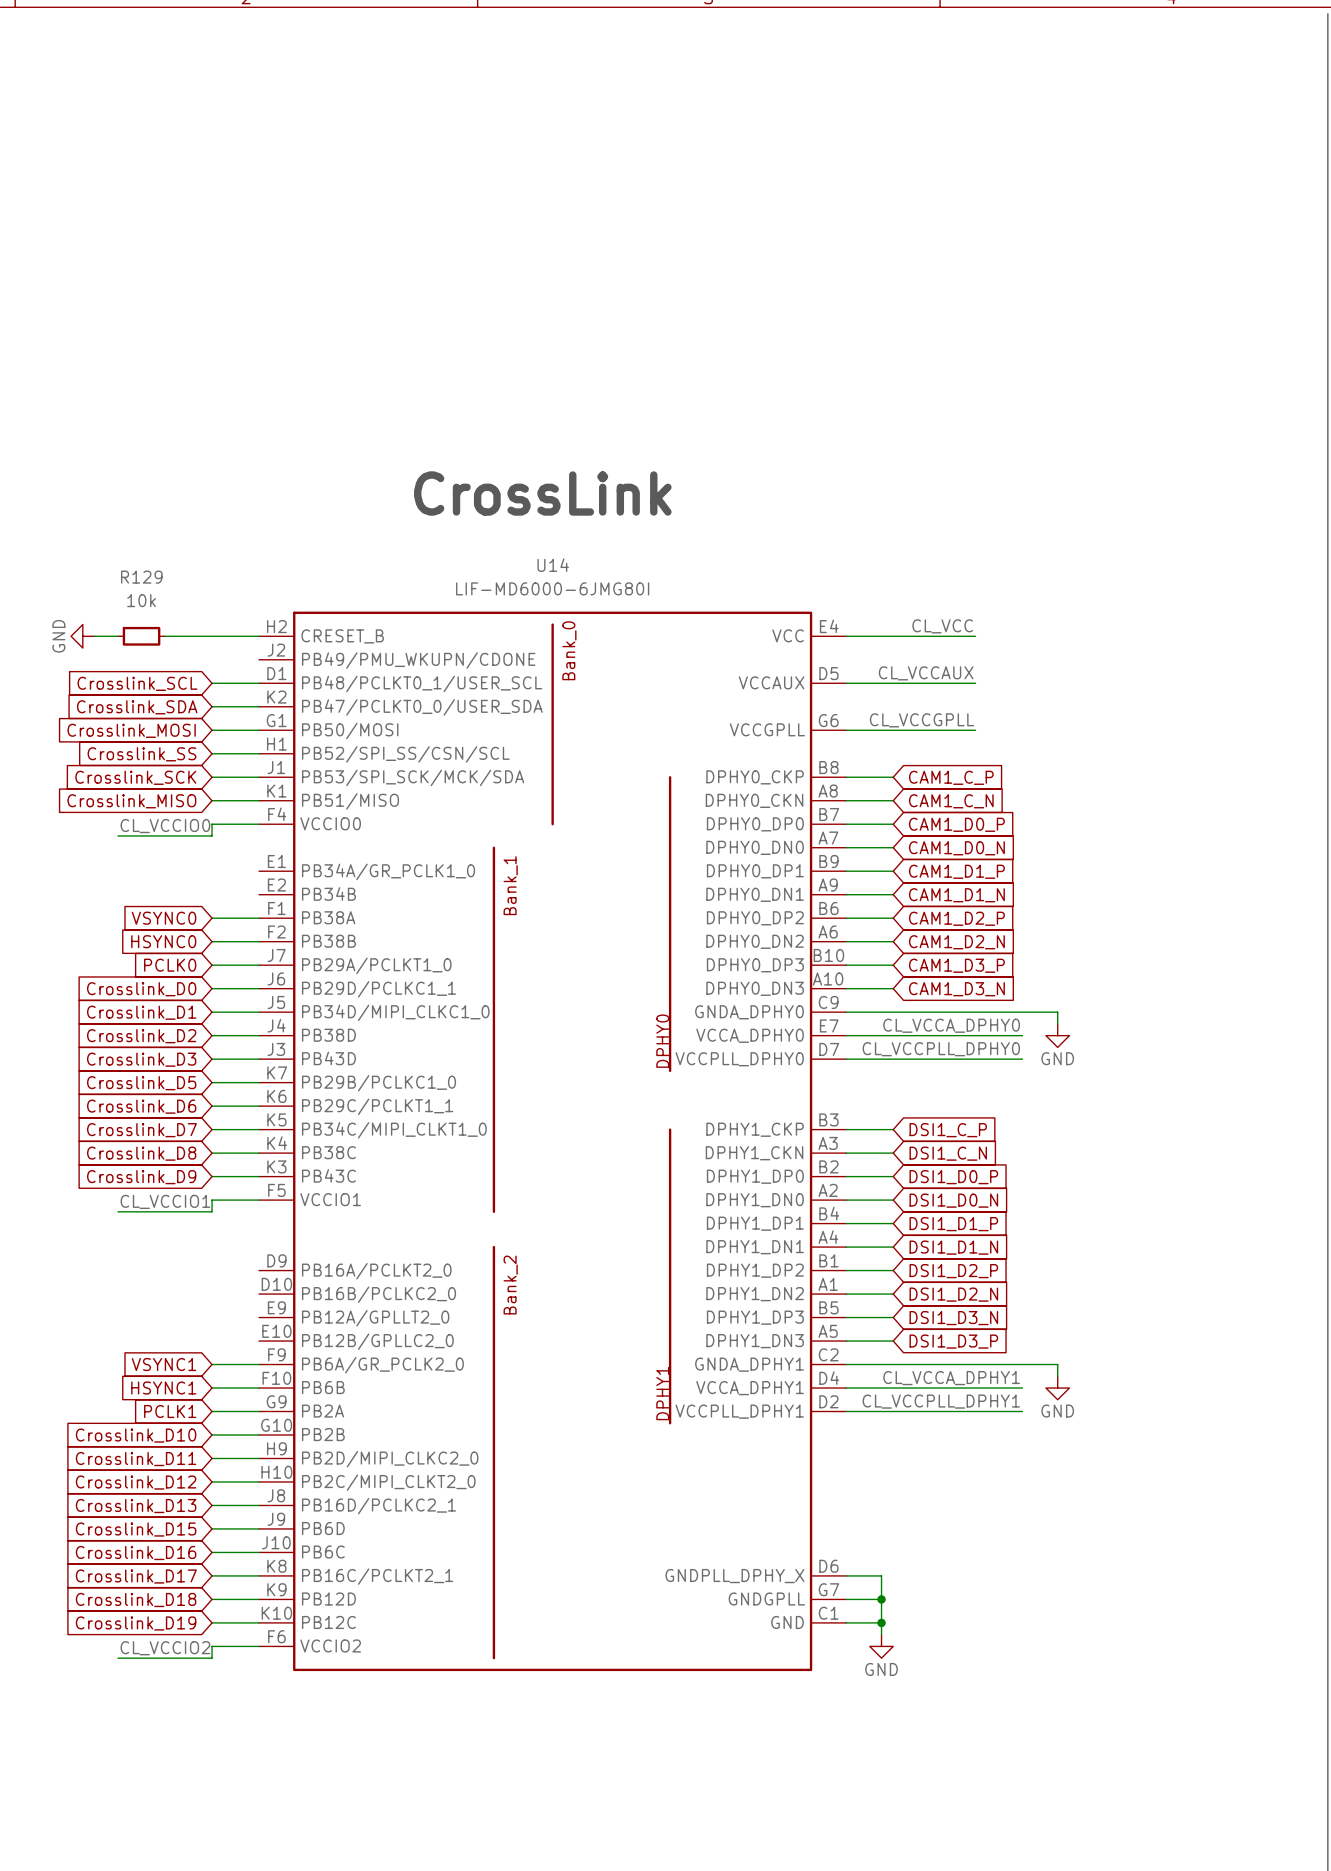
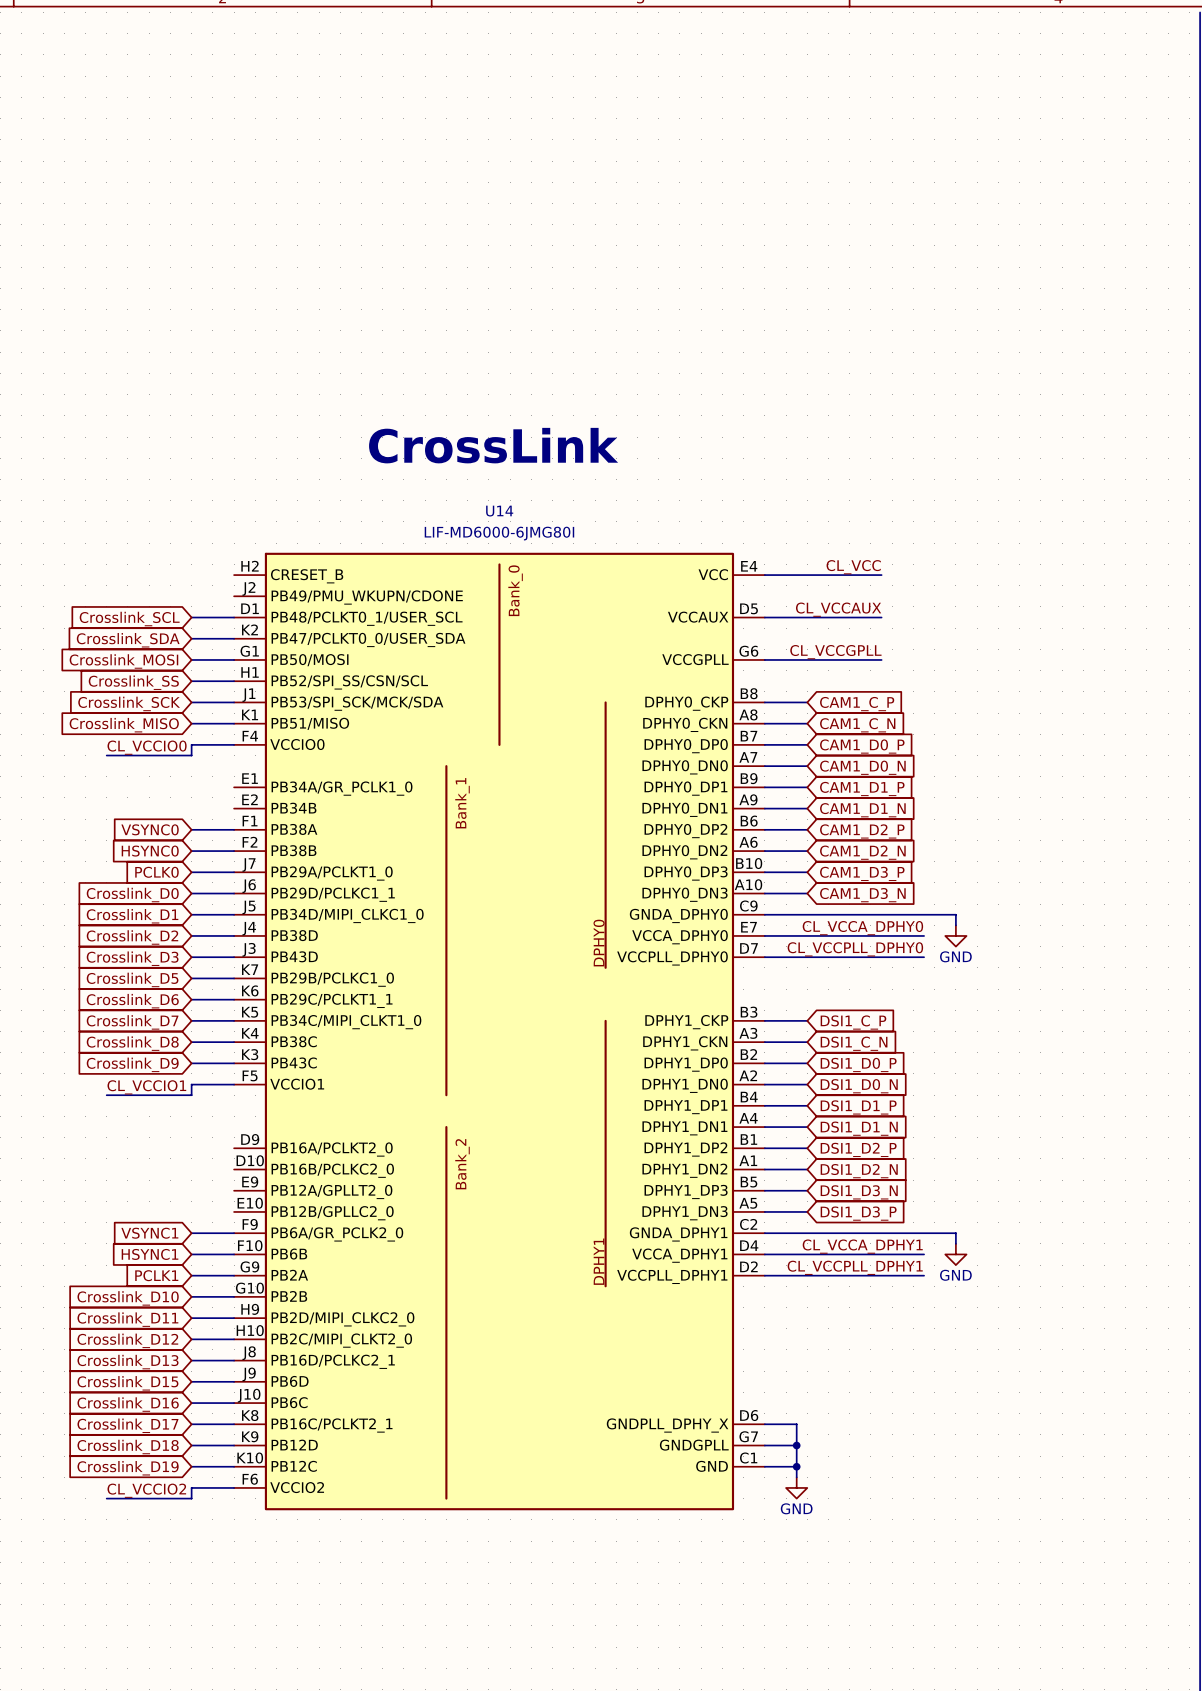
power symbol: GND (82, 636) -> none
wire: (94, 636) (118, 636) -> none
R129: (141, 636) -> none
wire: (165, 636) (259, 636) -> none

